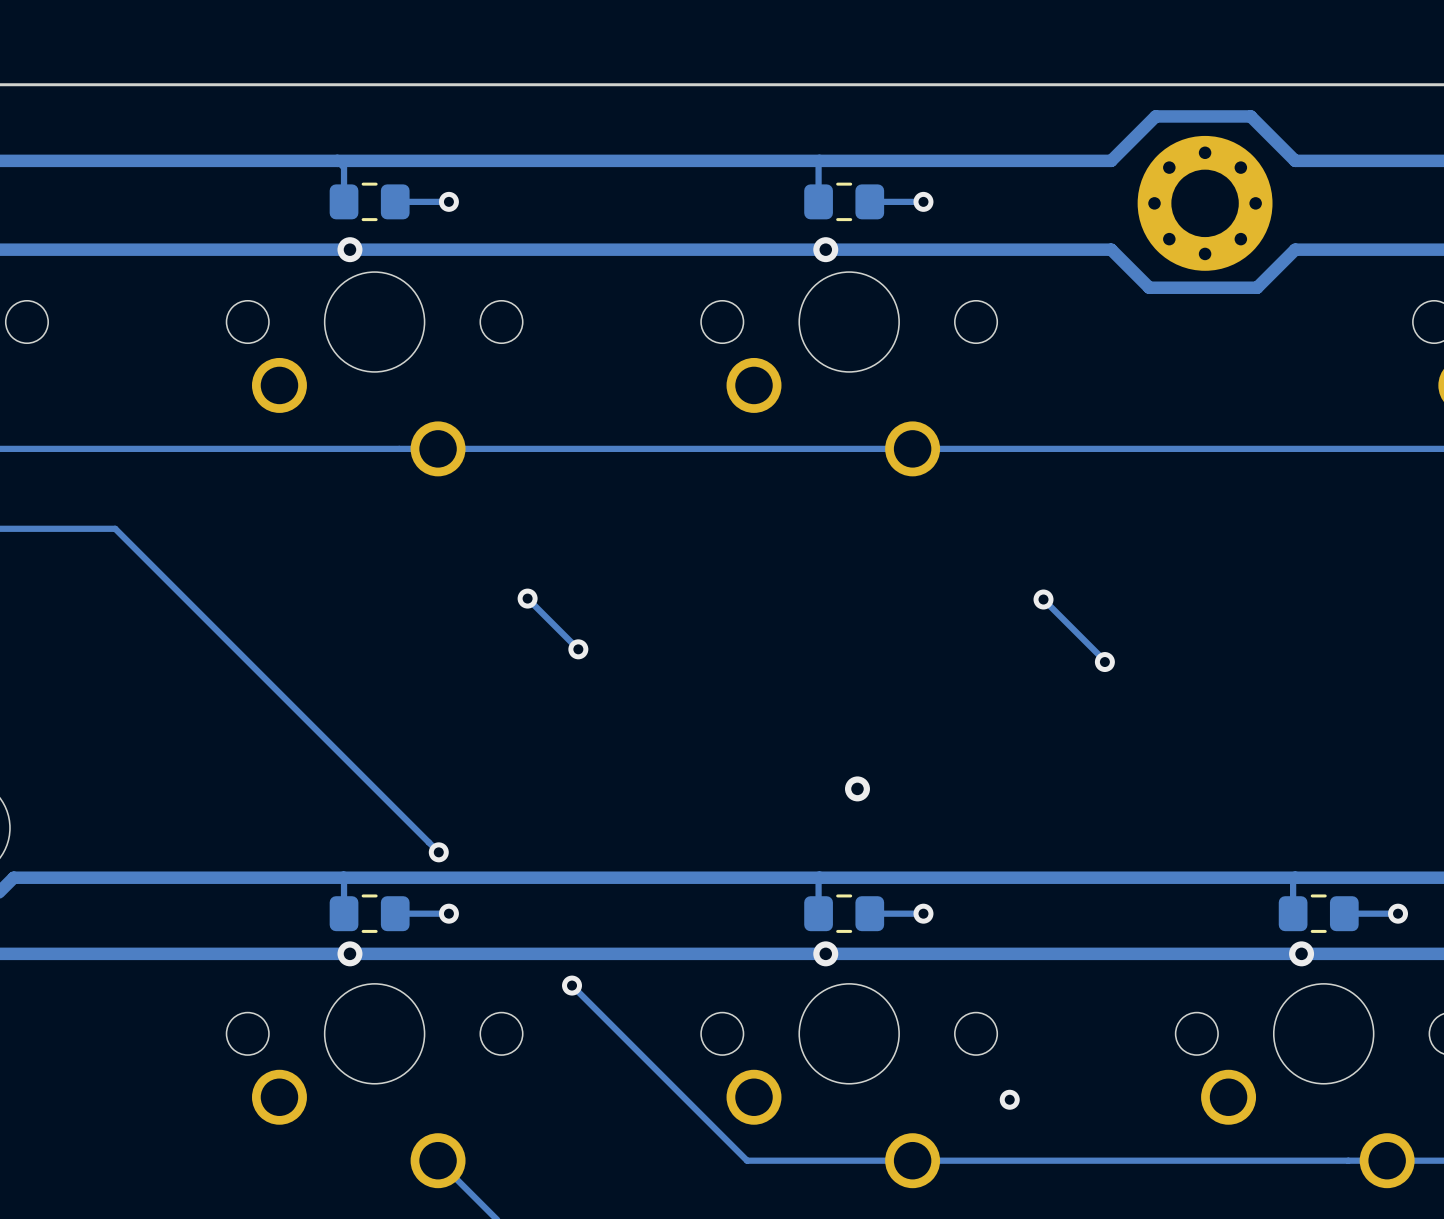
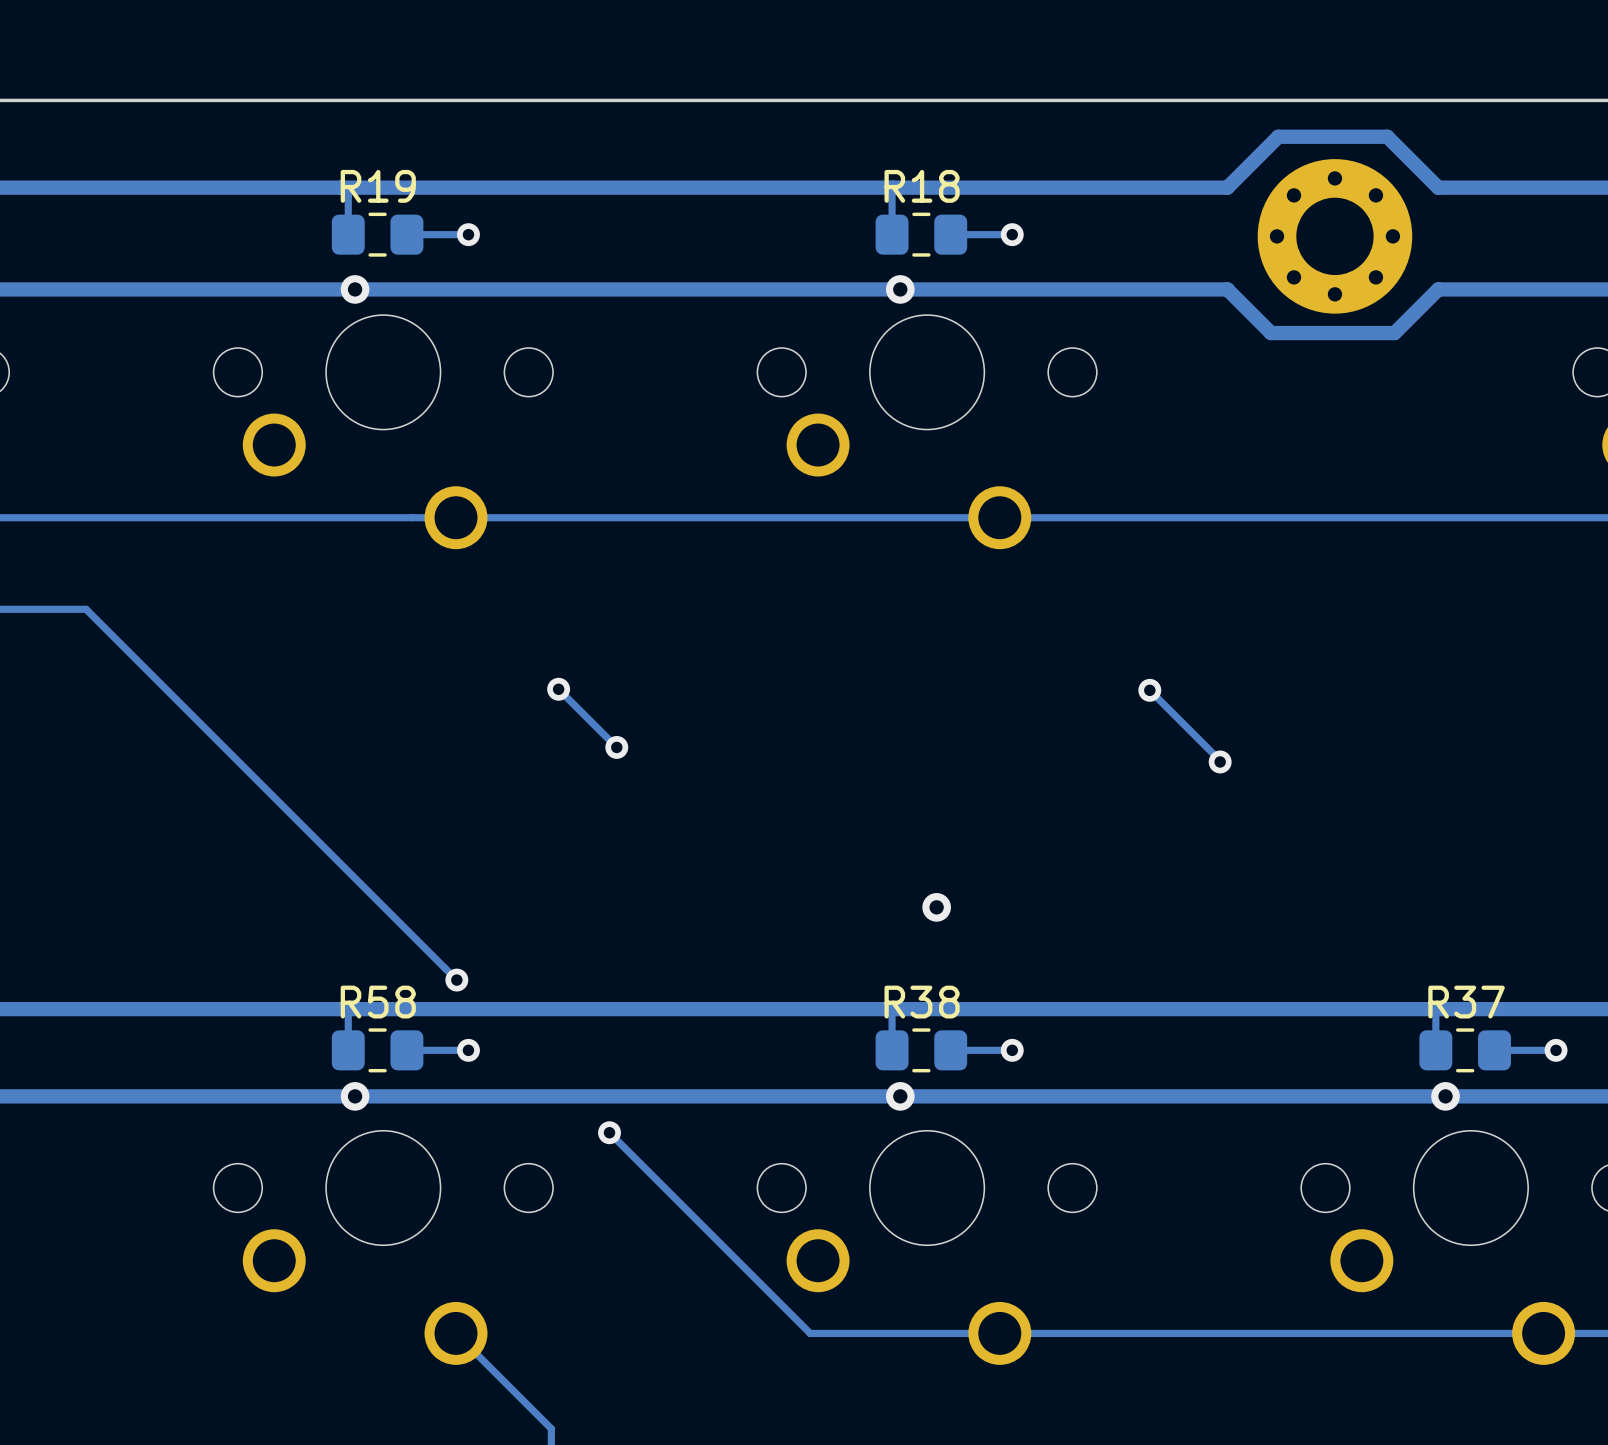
R19 name: none -> R19 (378, 186)
R18 name: none -> R18 (922, 186)
R58 name: none -> R58 (378, 1002)
R38 name: none -> R38 (922, 1002)
R37 name: none -> R37 (1466, 1002)
via: (1009, 1099) -> none

